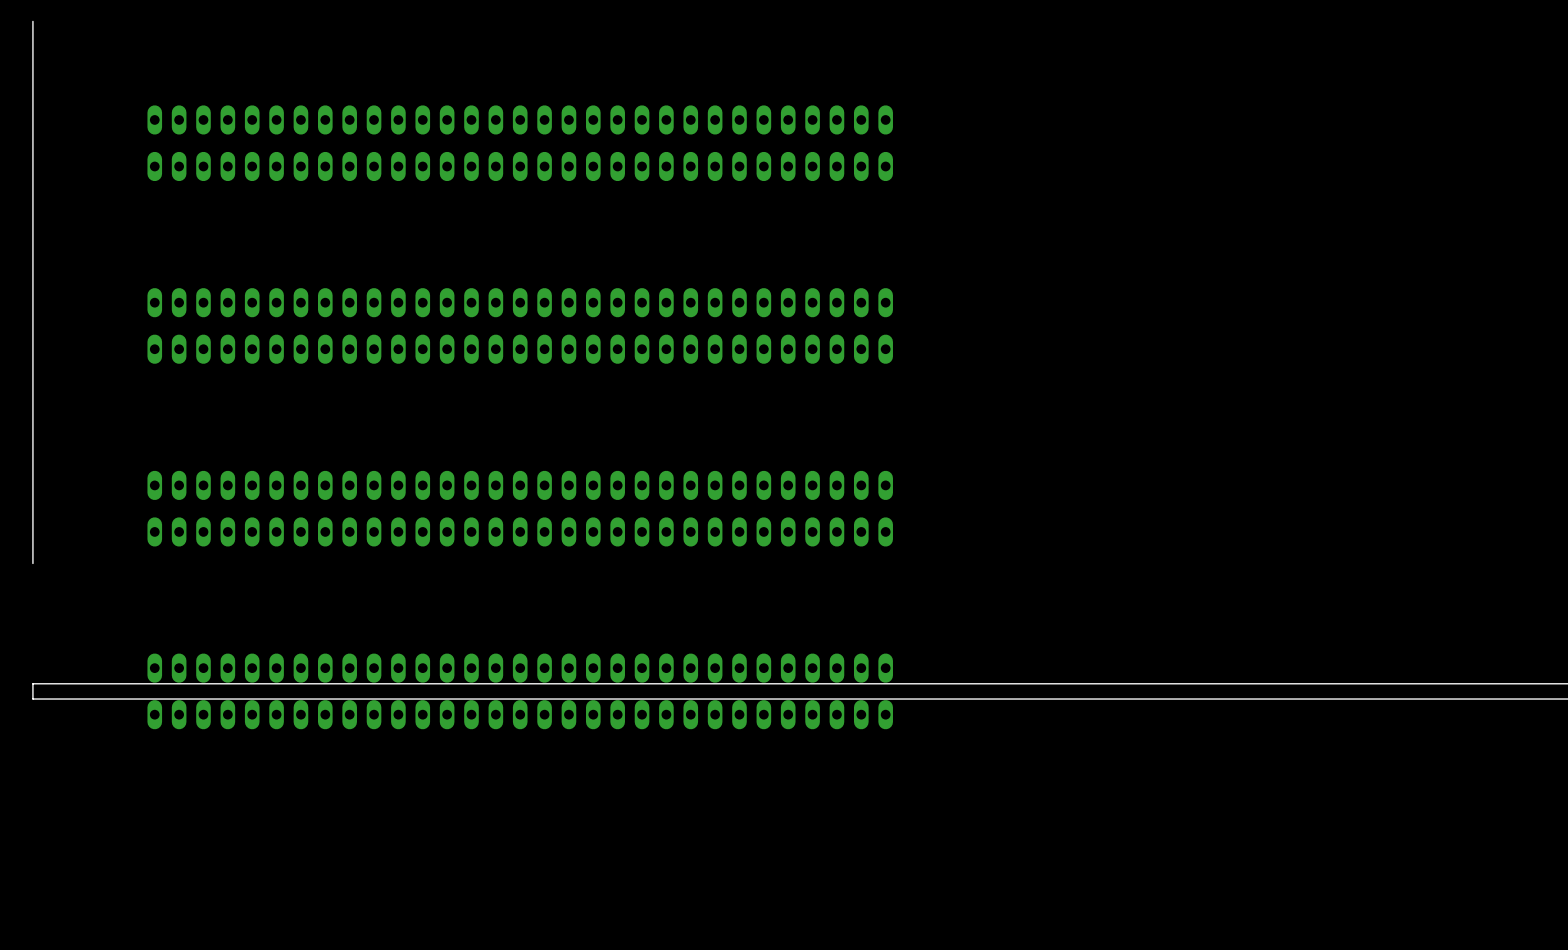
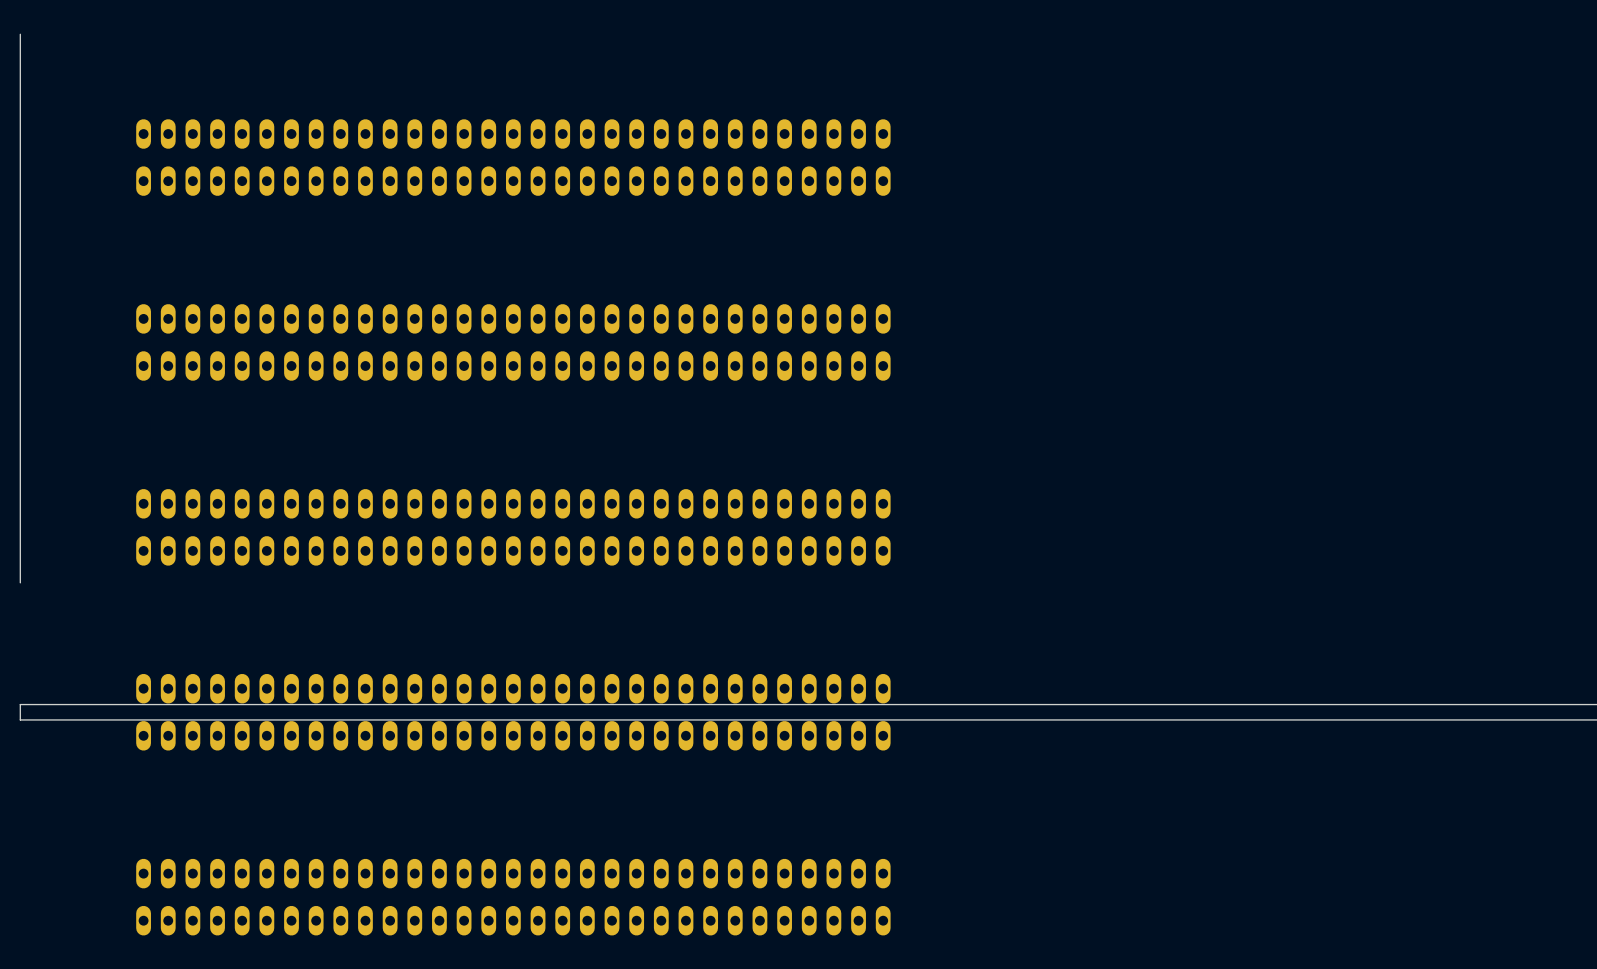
part: none -> (513, 897)

